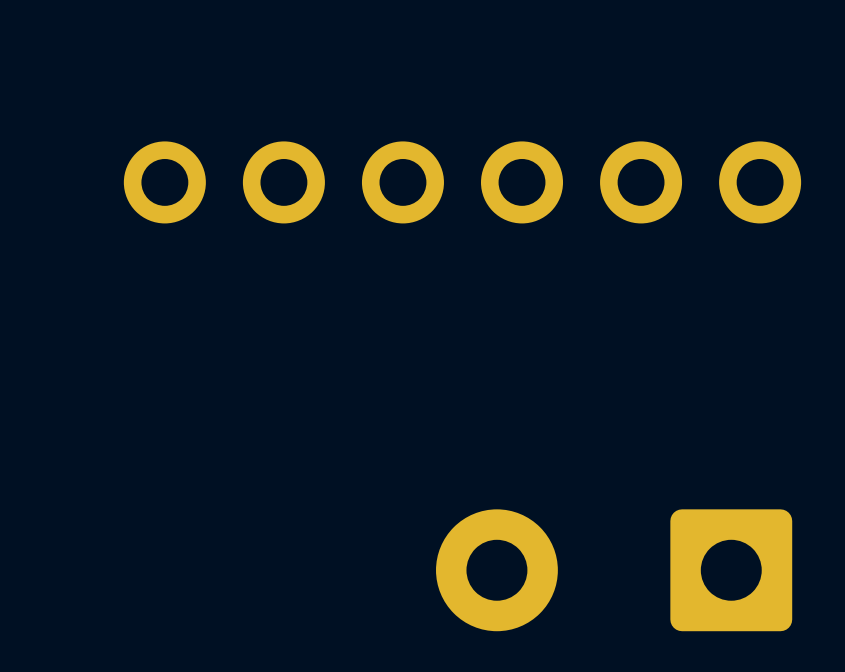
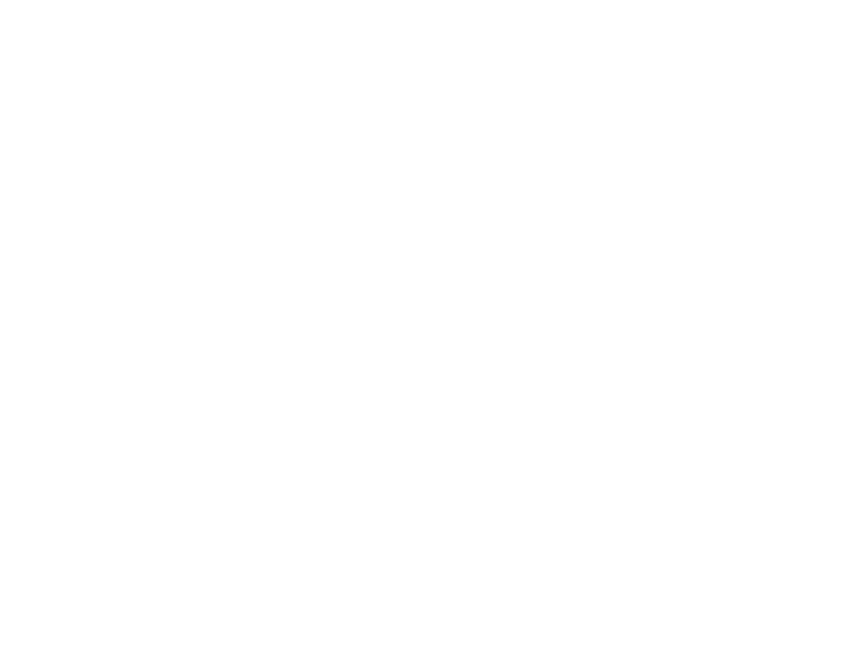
part: (462, 182) -> none
part: (614, 570) -> none

